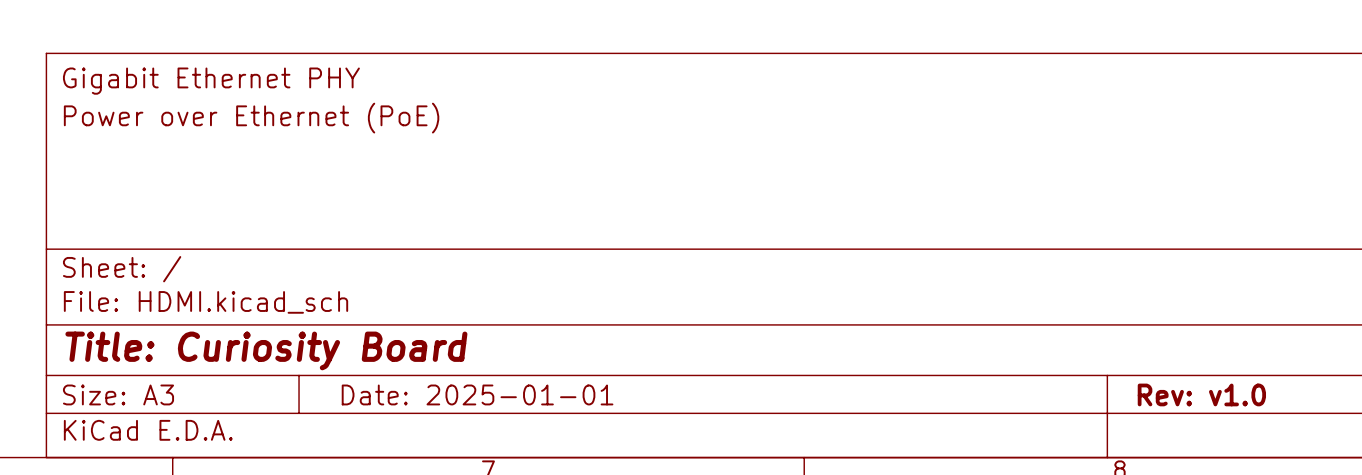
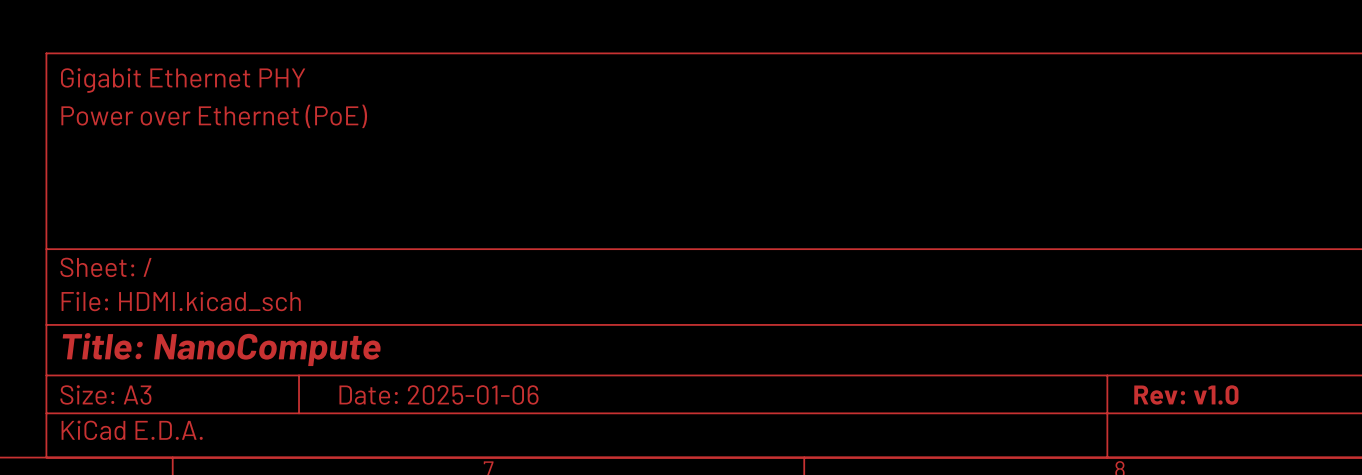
title block: Title: Curiosity Board (266, 350) -> Title: NanoCompute (221, 349)
title block: Date: 2025-01-01 (477, 394) -> Date: 2025-01-06 (438, 394)

